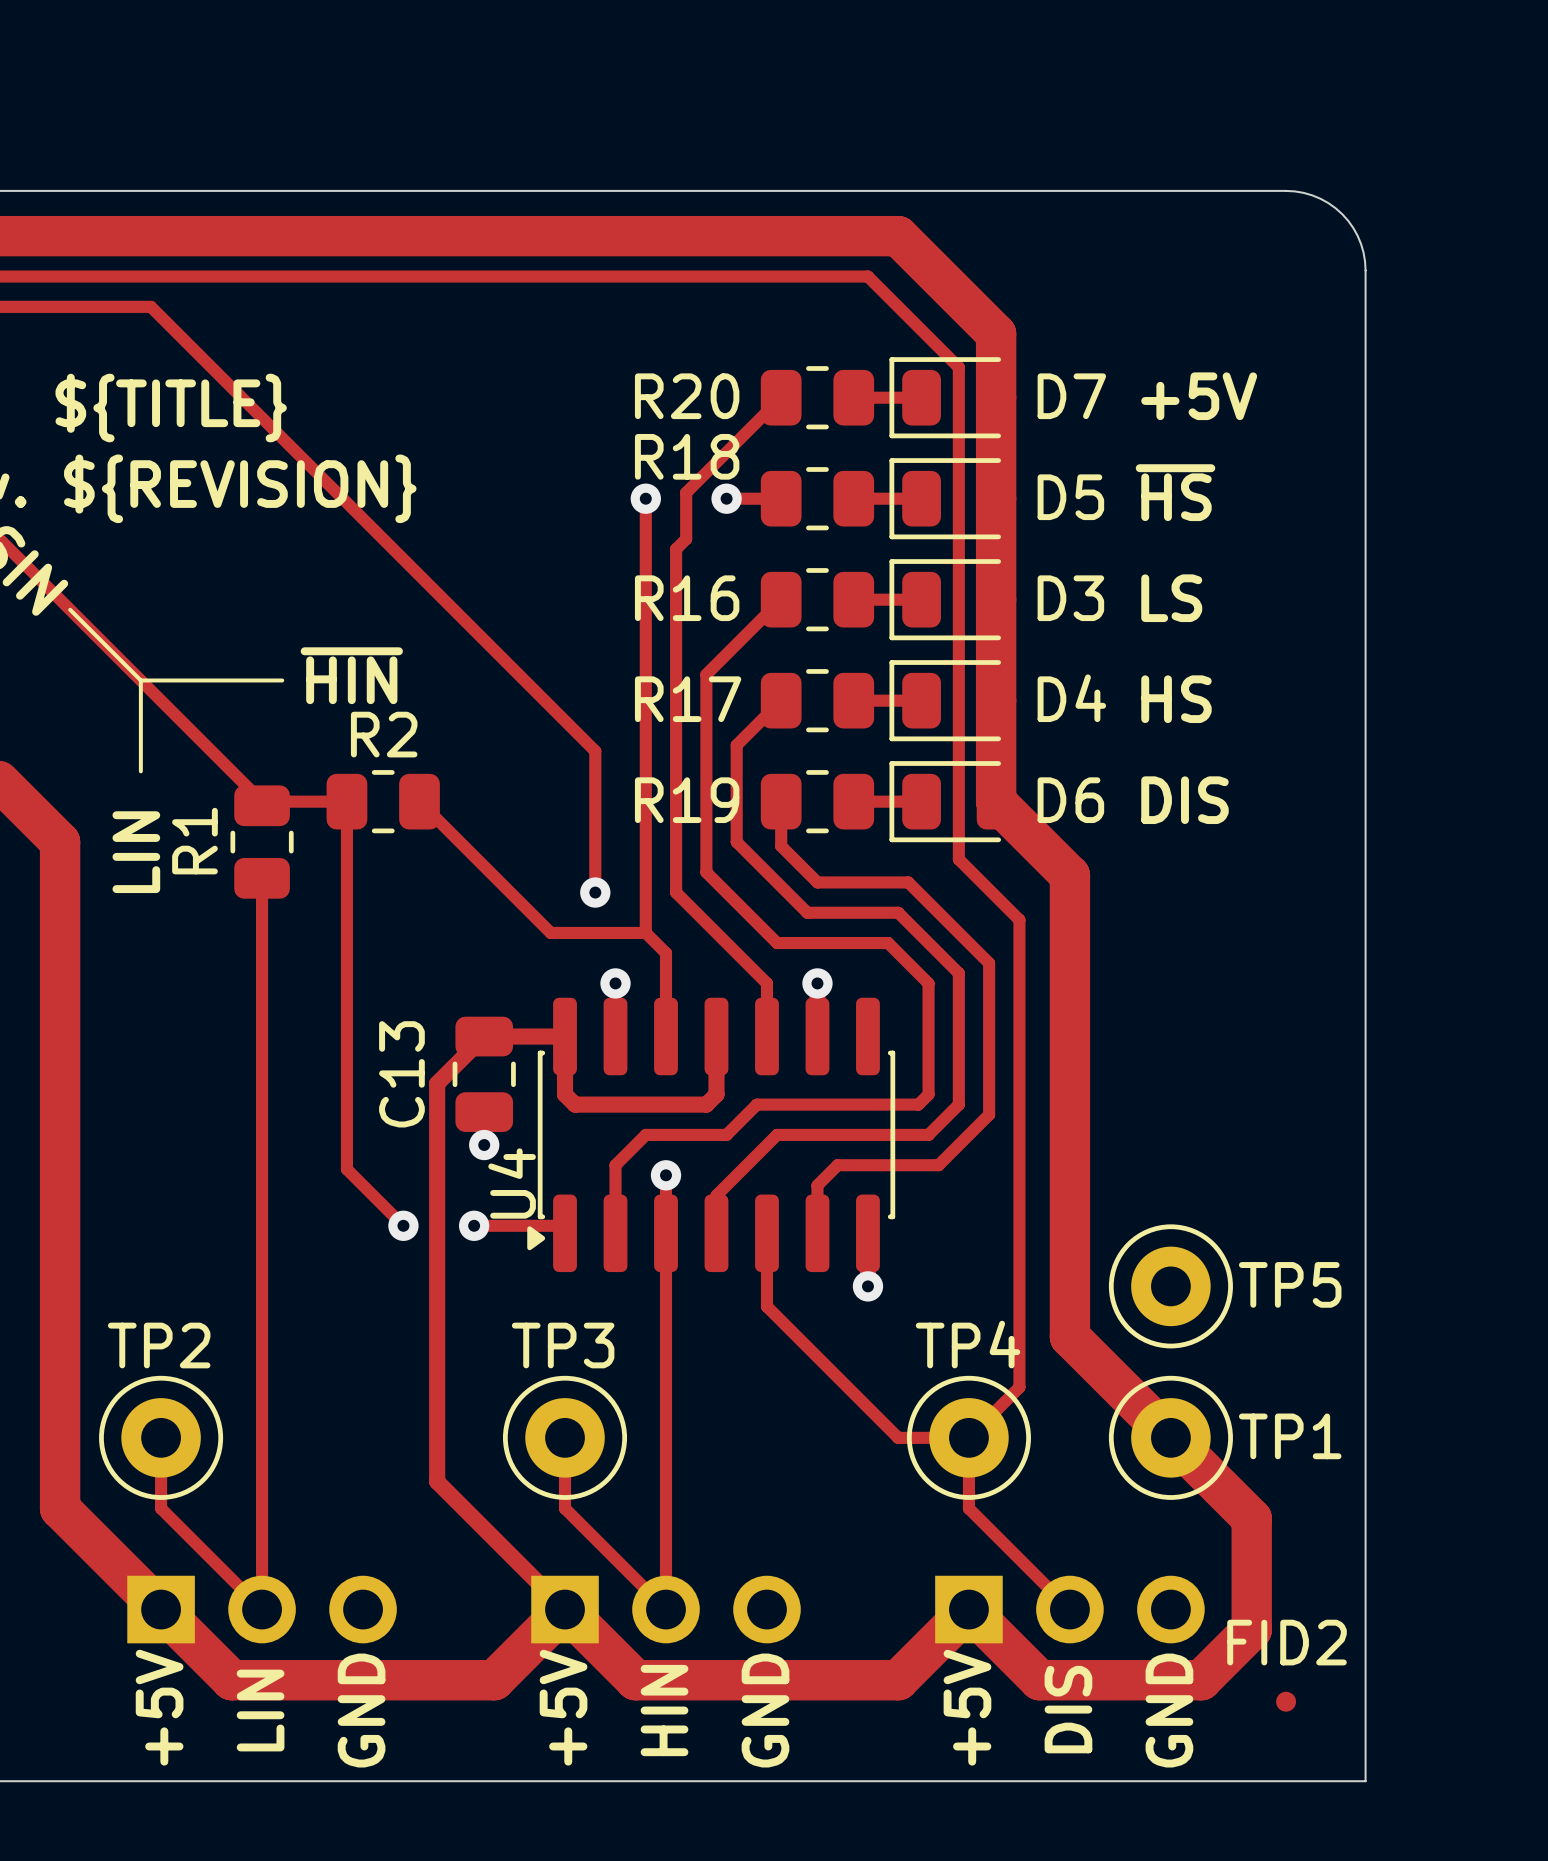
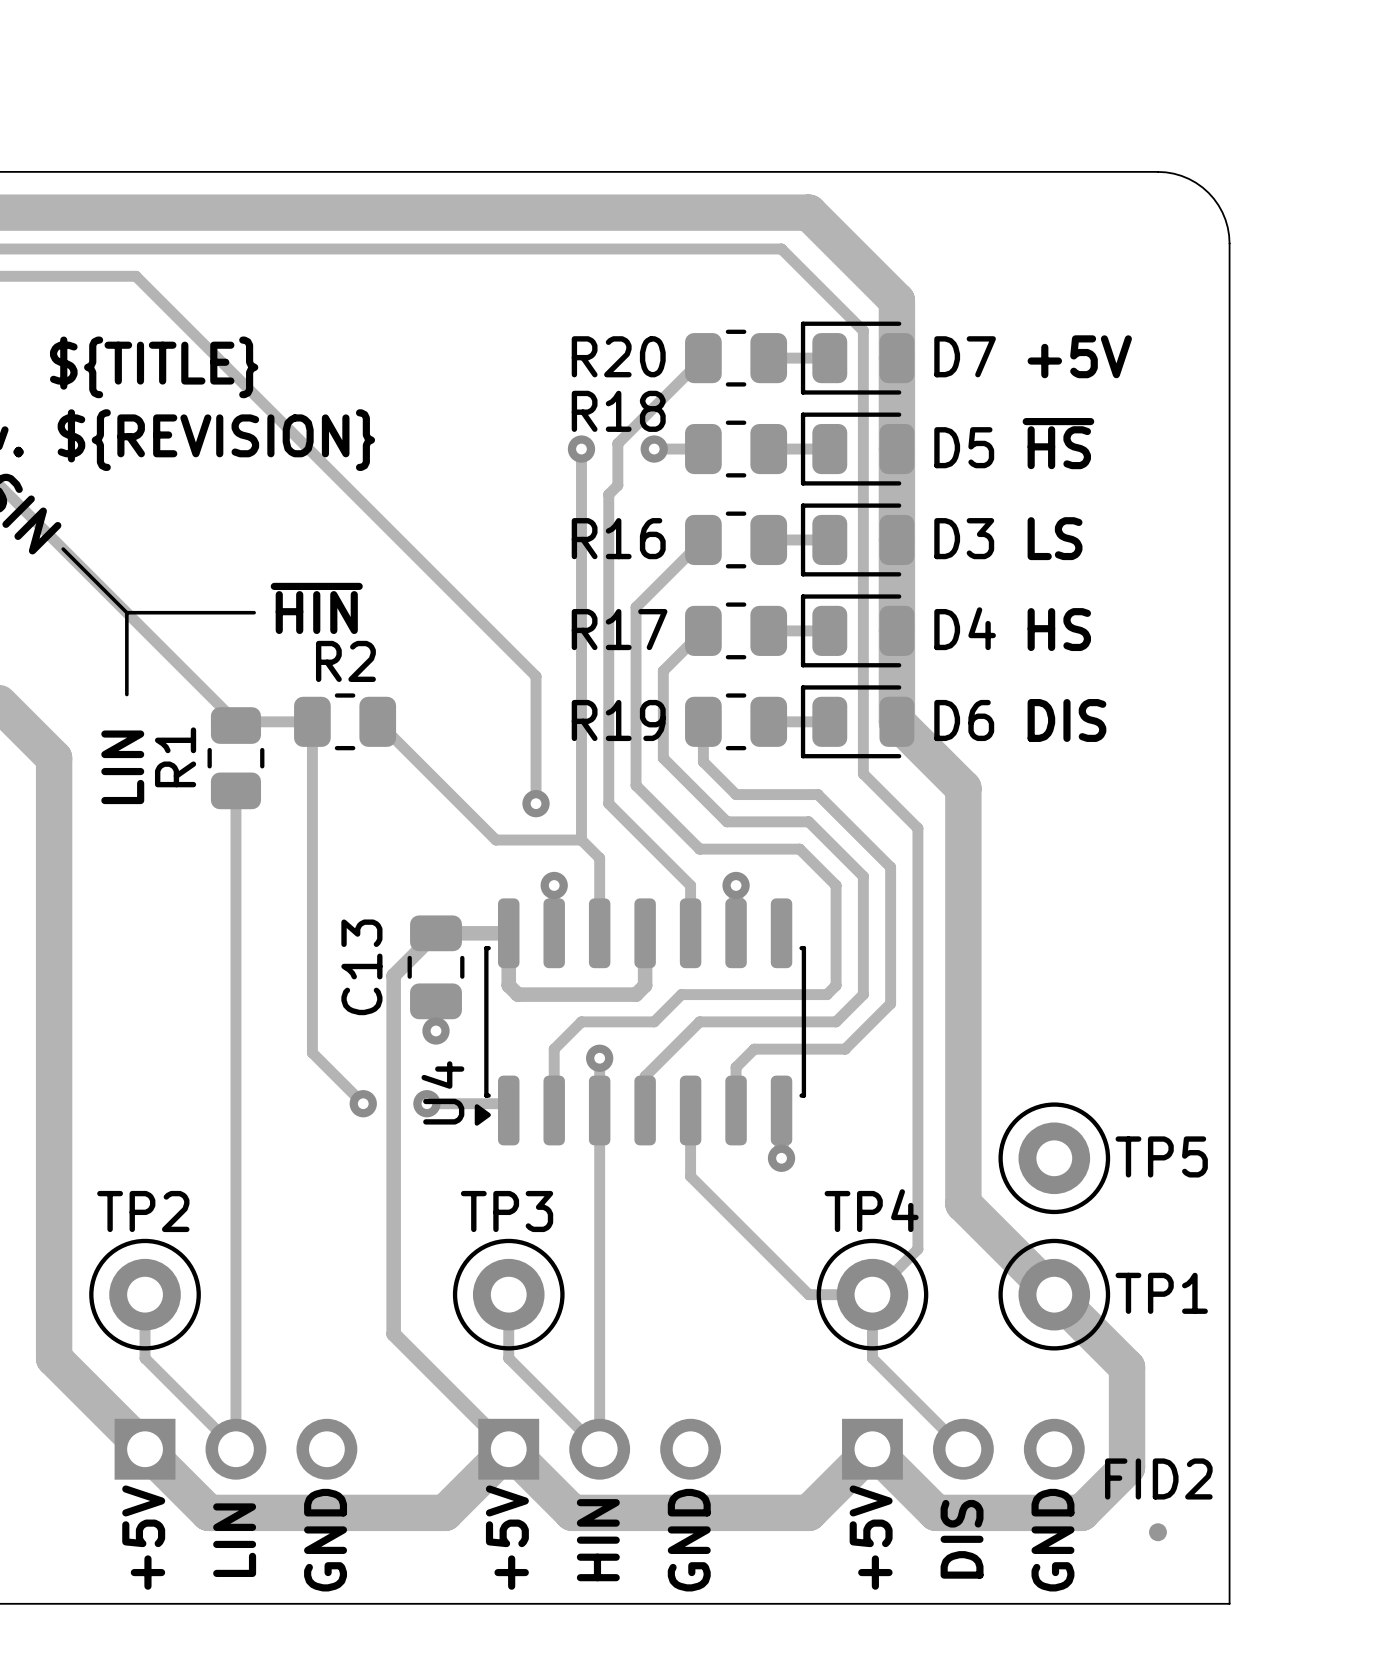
U4 name position: U4 (512, 1183) -> U4 (442, 1092)

